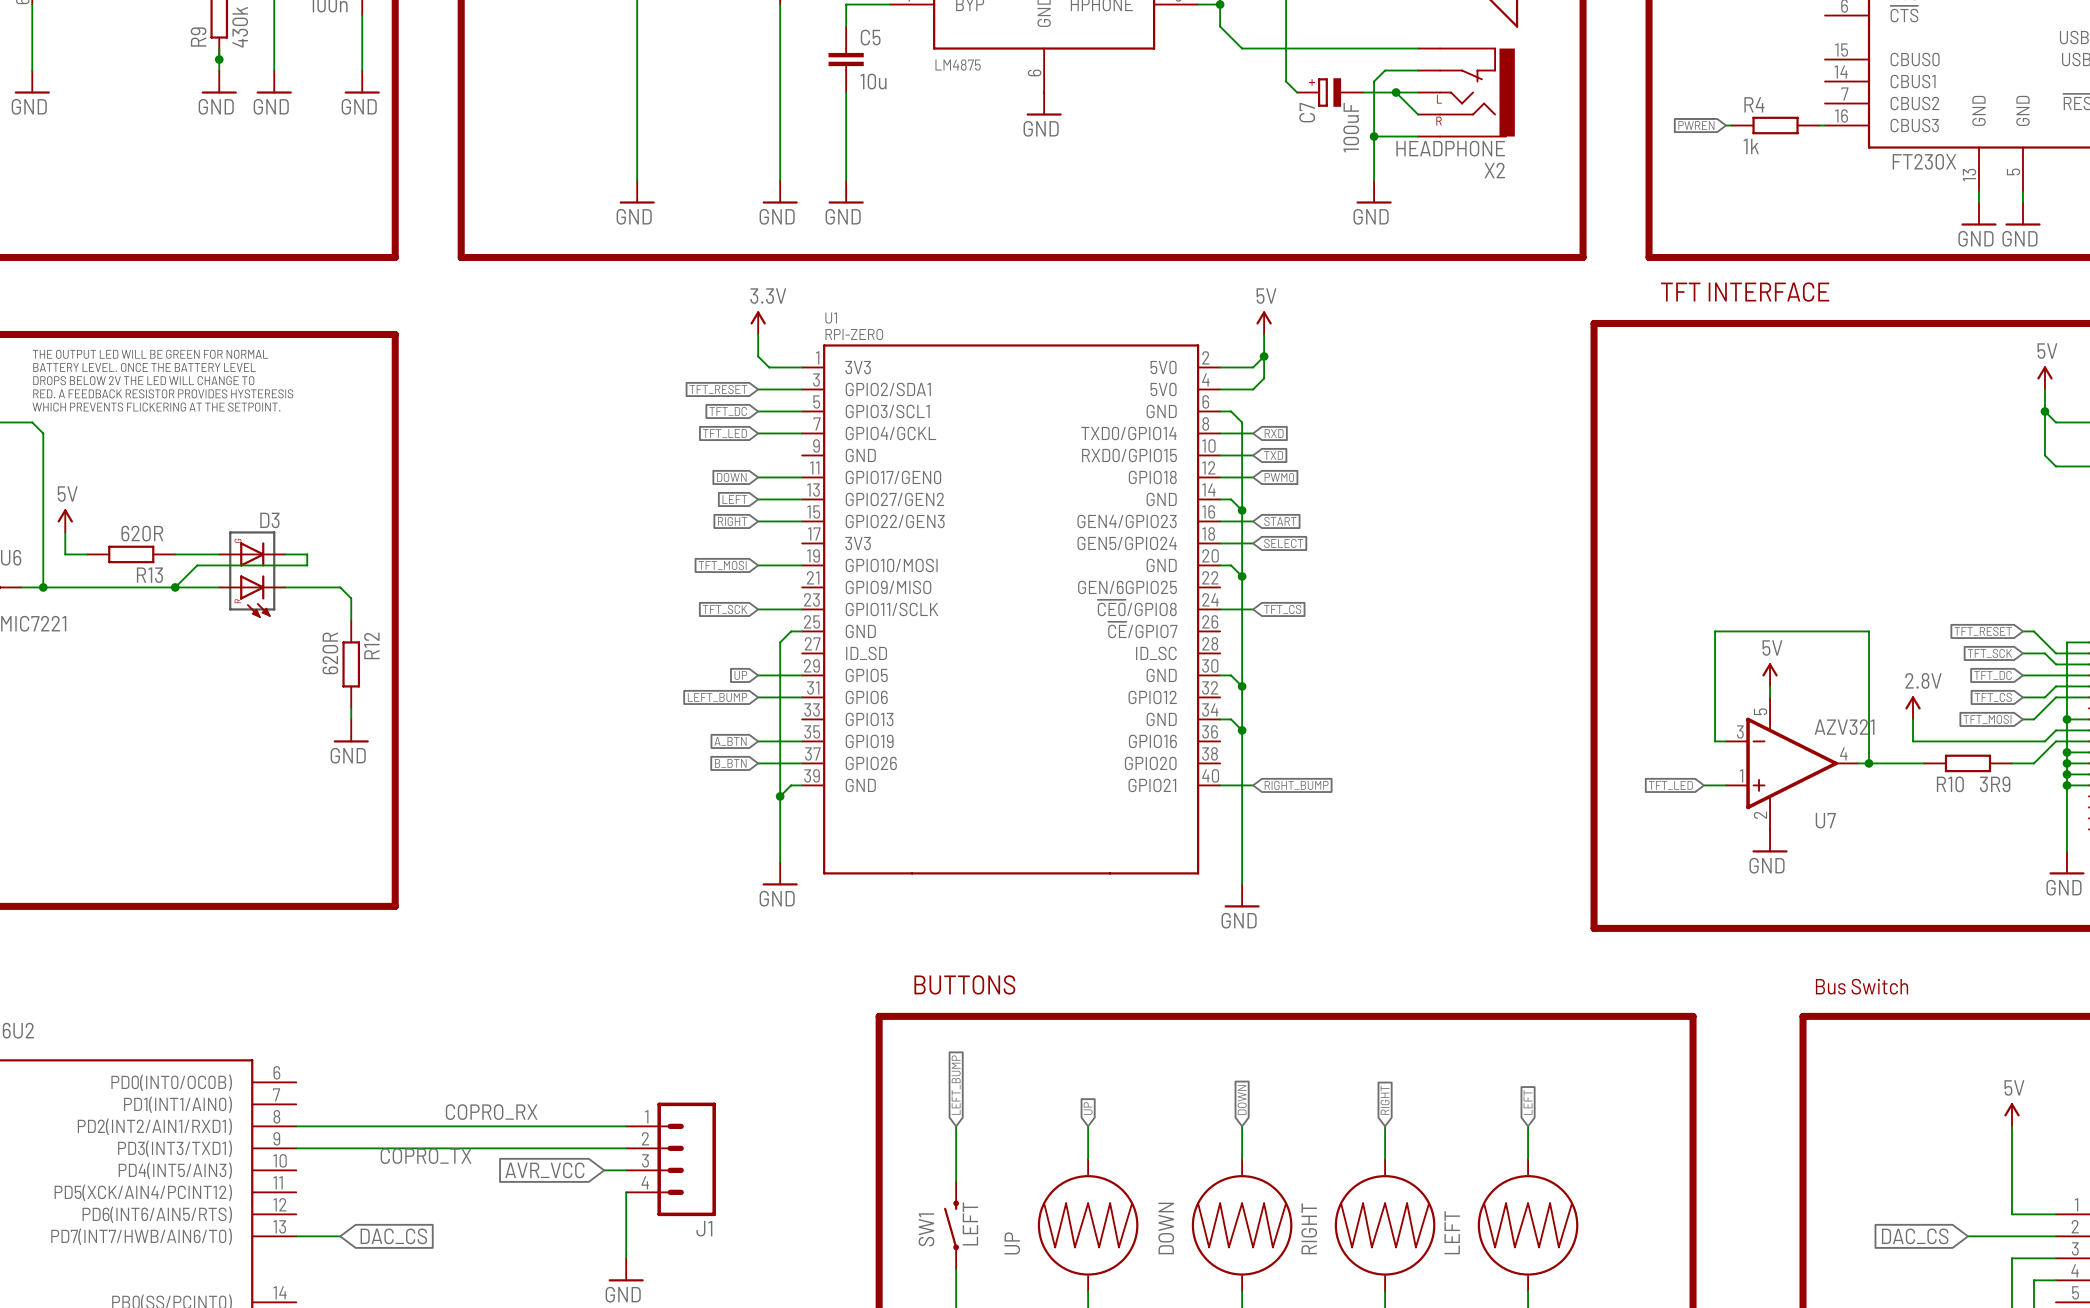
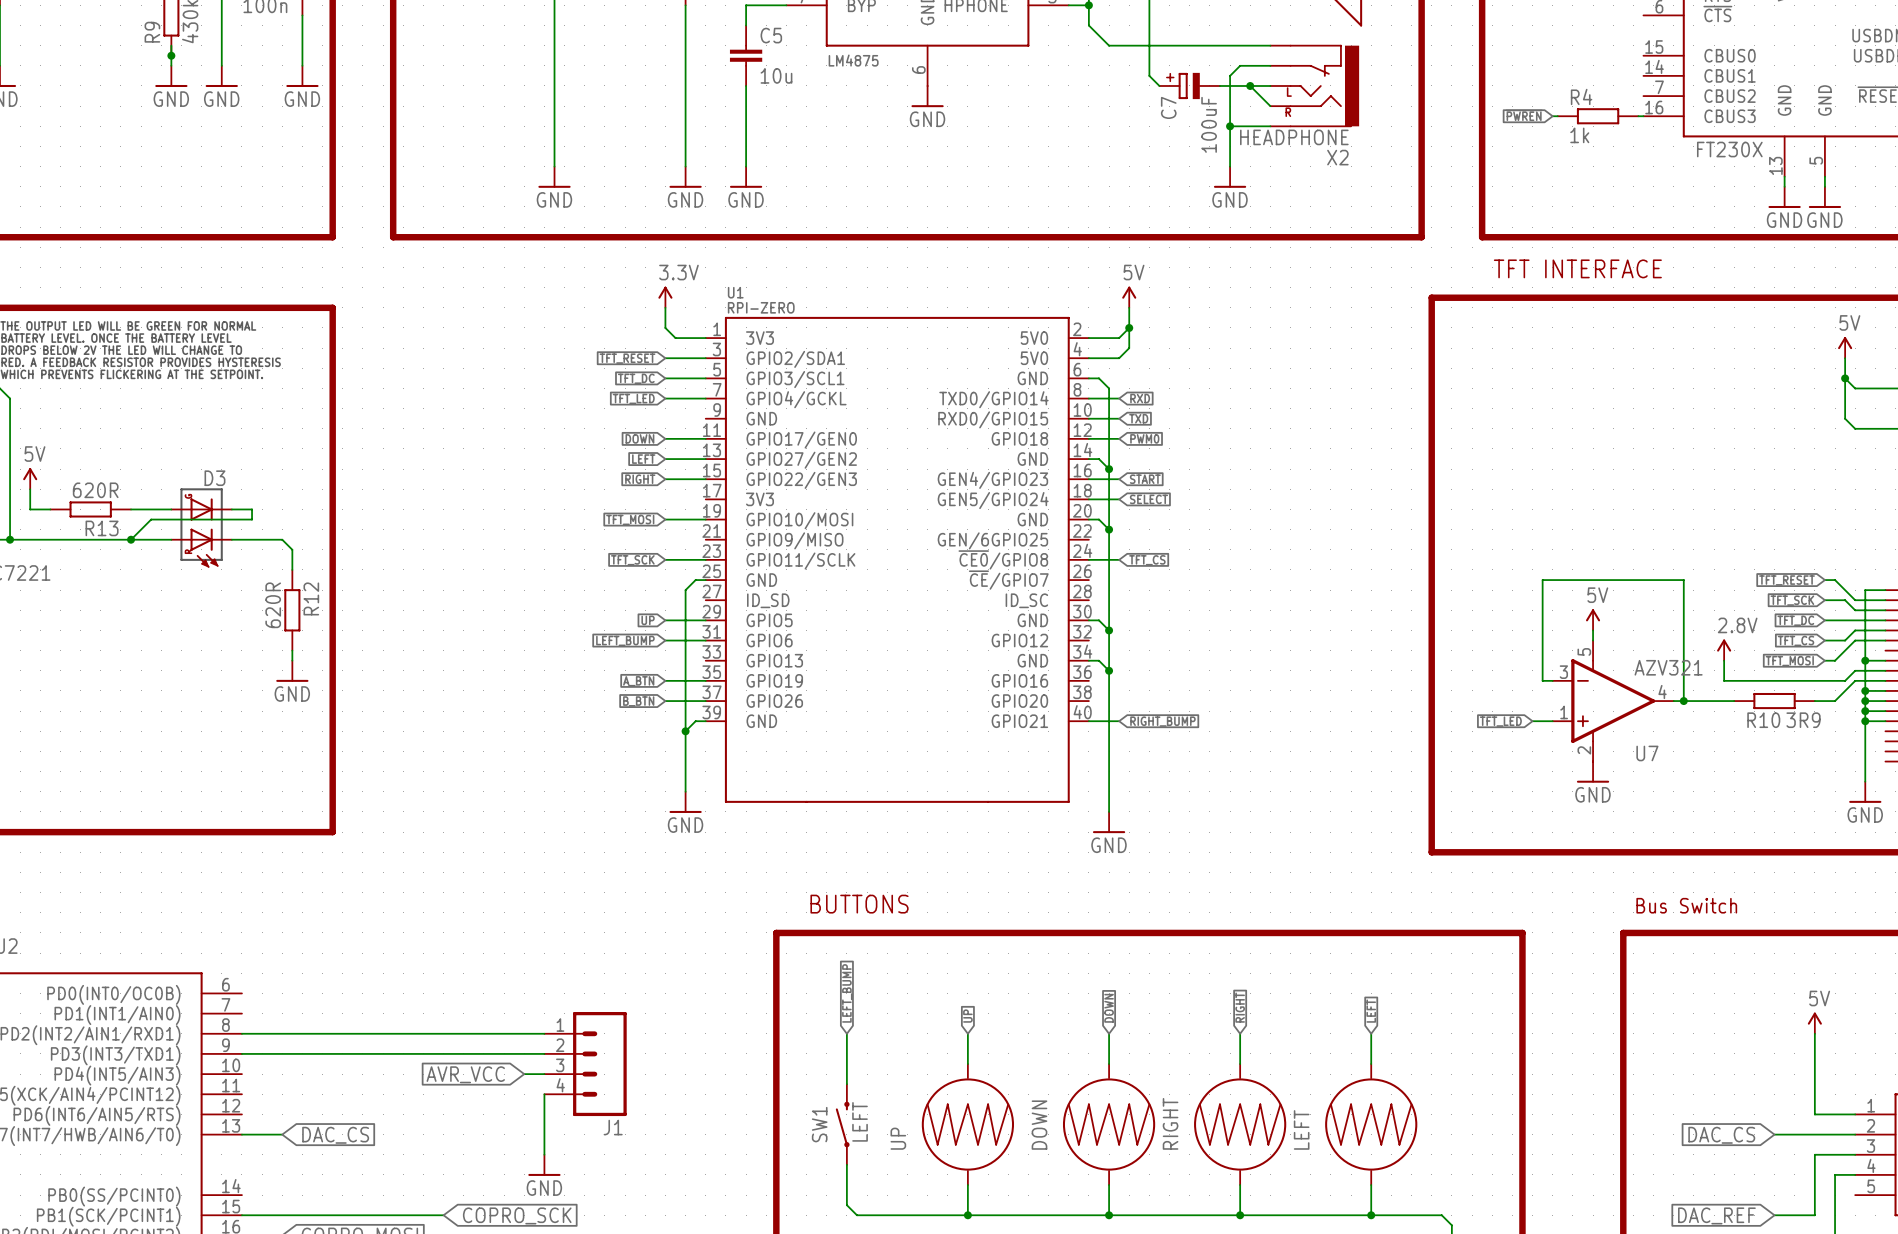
label: COPRO_RX (491, 1112) -> none
label: COPRO_TX (426, 1156) -> none

